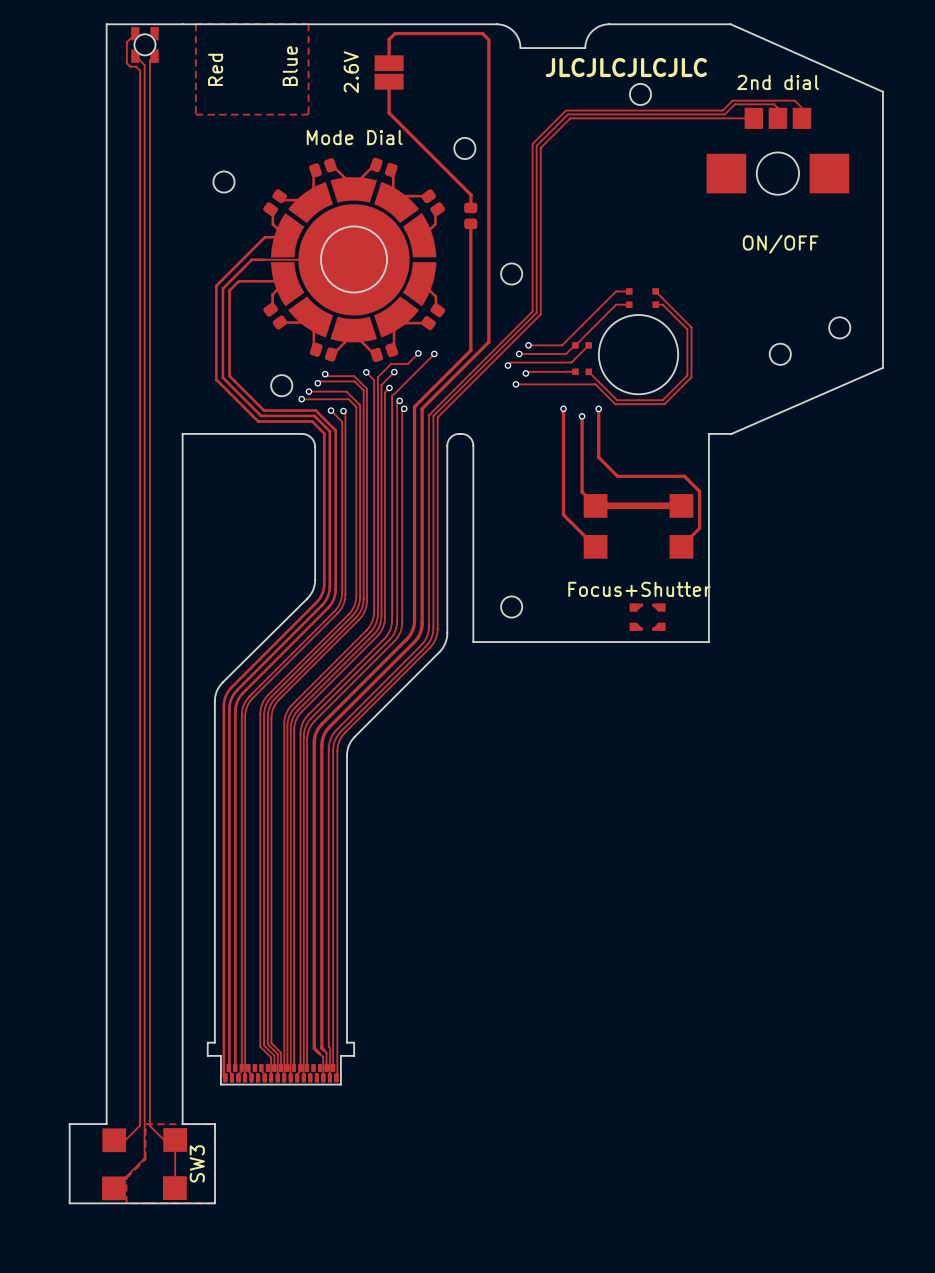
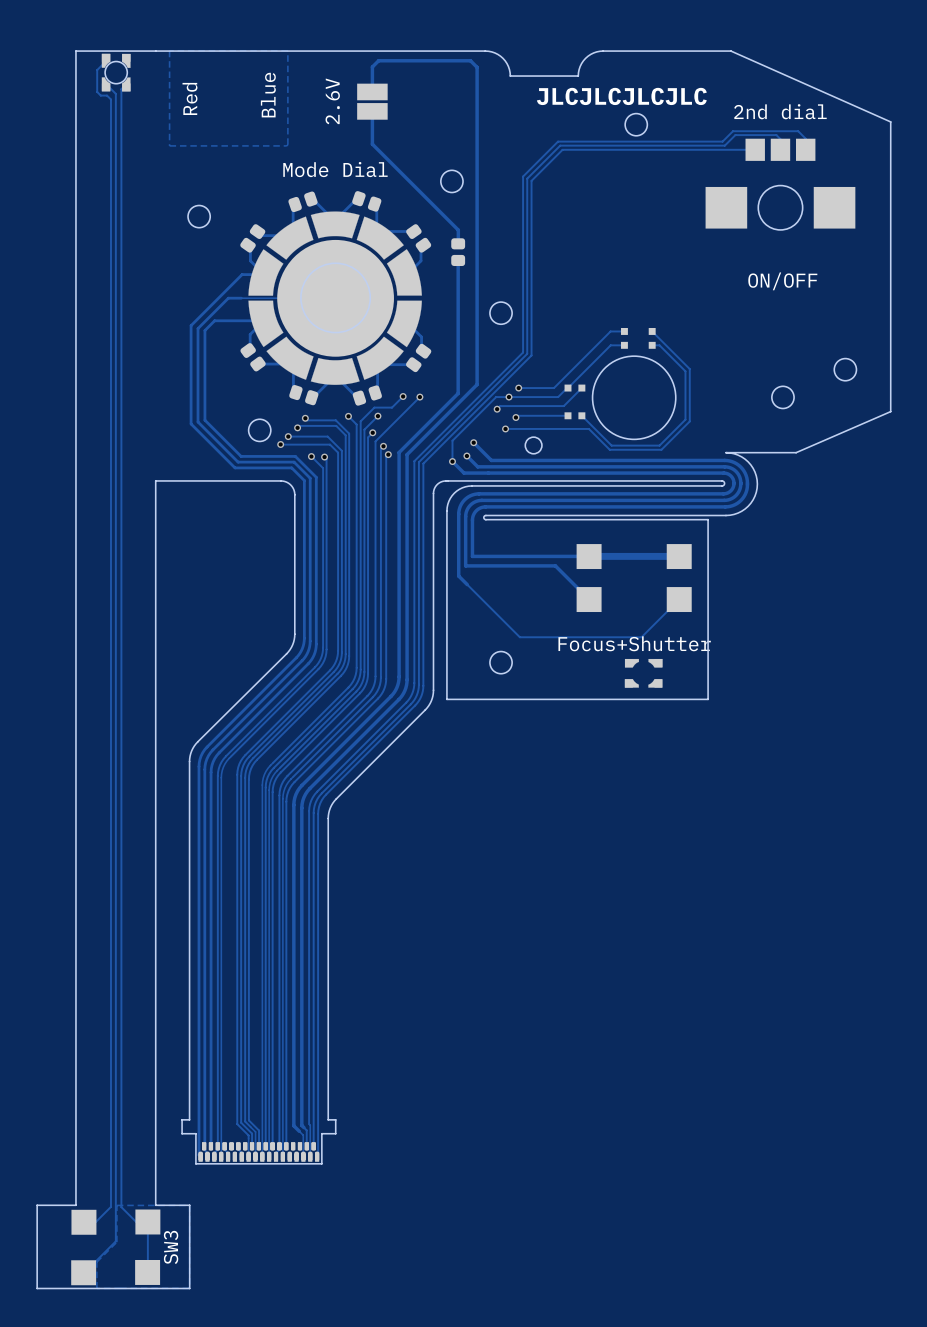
track: none -> (509, 397) (496, 397) (452, 440) (452, 459)
board edge: (882, 367) (731, 433) (722, 433) -> (890, 411) (796, 452) (725, 452) (734, 453) (745, 459) (753, 468) (757, 479) (756, 492) (753, 499) (745, 509) (734, 514) (485, 515) (483, 517) (485, 519) (708, 519)
round board edge: none -> [524, 436, 543, 455]
via: none -> (473, 442)
via: (563, 408) -> none
track: (564, 408) (563, 514) -> (466, 456) (477, 466) (724, 466) (734, 470) (739, 476) (740, 485) (738, 492) (733, 497) (726, 500) (481, 500) (473, 502) (468, 507) (465, 516) (465, 565) (555, 565)
track: (598, 408) (598, 457) (617, 476) (684, 476) (699, 491) (699, 528) (681, 546) -> (466, 584) (519, 637) (641, 637) (679, 599)
via: (598, 408) -> none
via: none -> (466, 456)
track: none -> (452, 461) (464, 473) (723, 473) (731, 476) (733, 481) (731, 489) (723, 493) (472, 495) (463, 501) (458, 511) (458, 576) (467, 584)
via: none -> (452, 461)
track: (582, 416) (582, 492) (595, 505) -> (473, 442) (491, 460) (724, 460) (736, 463) (745, 473) (747, 483) (745, 494) (739, 502) (727, 506) (485, 506) (477, 509) (473, 515) (472, 556) (589, 556)
via: (582, 416) -> none
board edge: (461, 433) (469, 437) (473, 445) (473, 642) -> (722, 480) (724, 483) (722, 485) (471, 485) (456, 491) (450, 498) (446, 510) (446, 699) (460, 699)
board edge: (708, 433) (708, 470) -> (708, 480) (448, 480)

